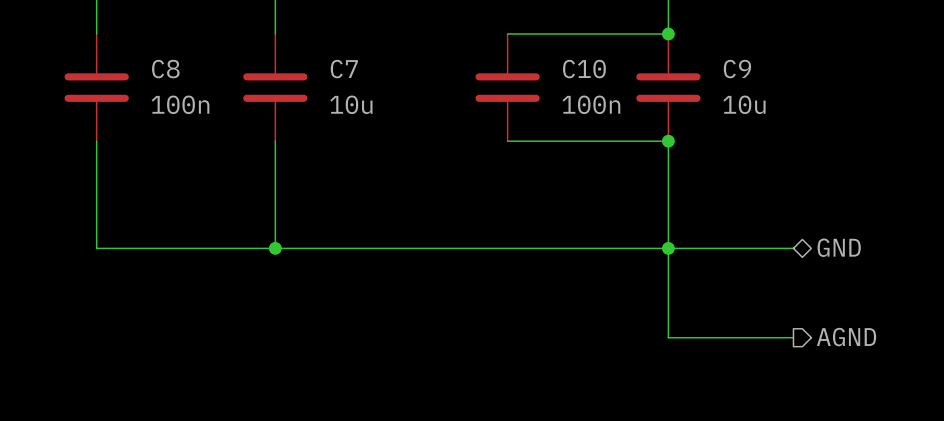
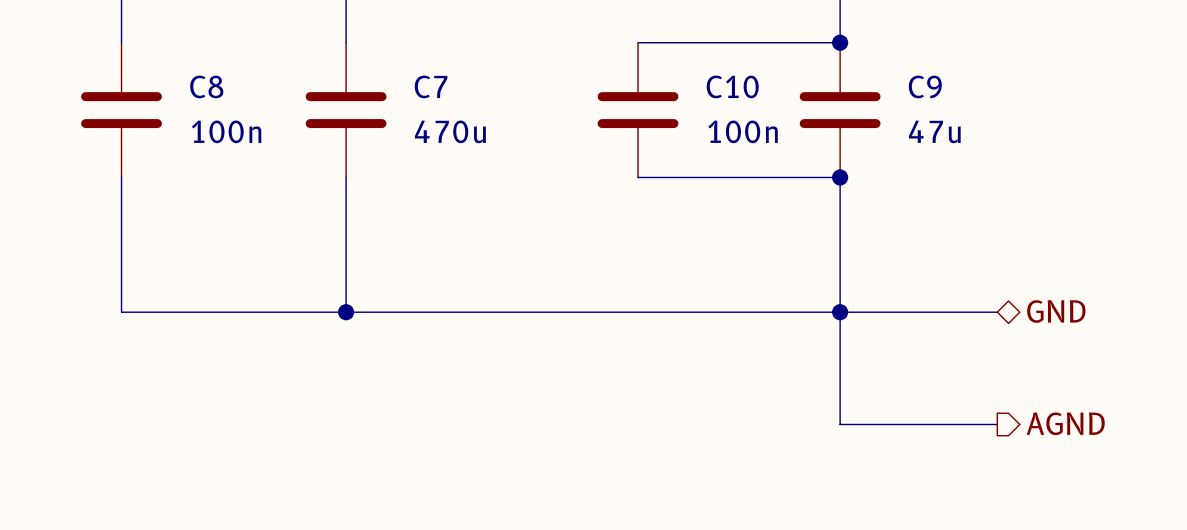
C7 value: 10u (351, 104) -> 470u (450, 131)
C9 value: 10u (744, 104) -> 47u (934, 131)

